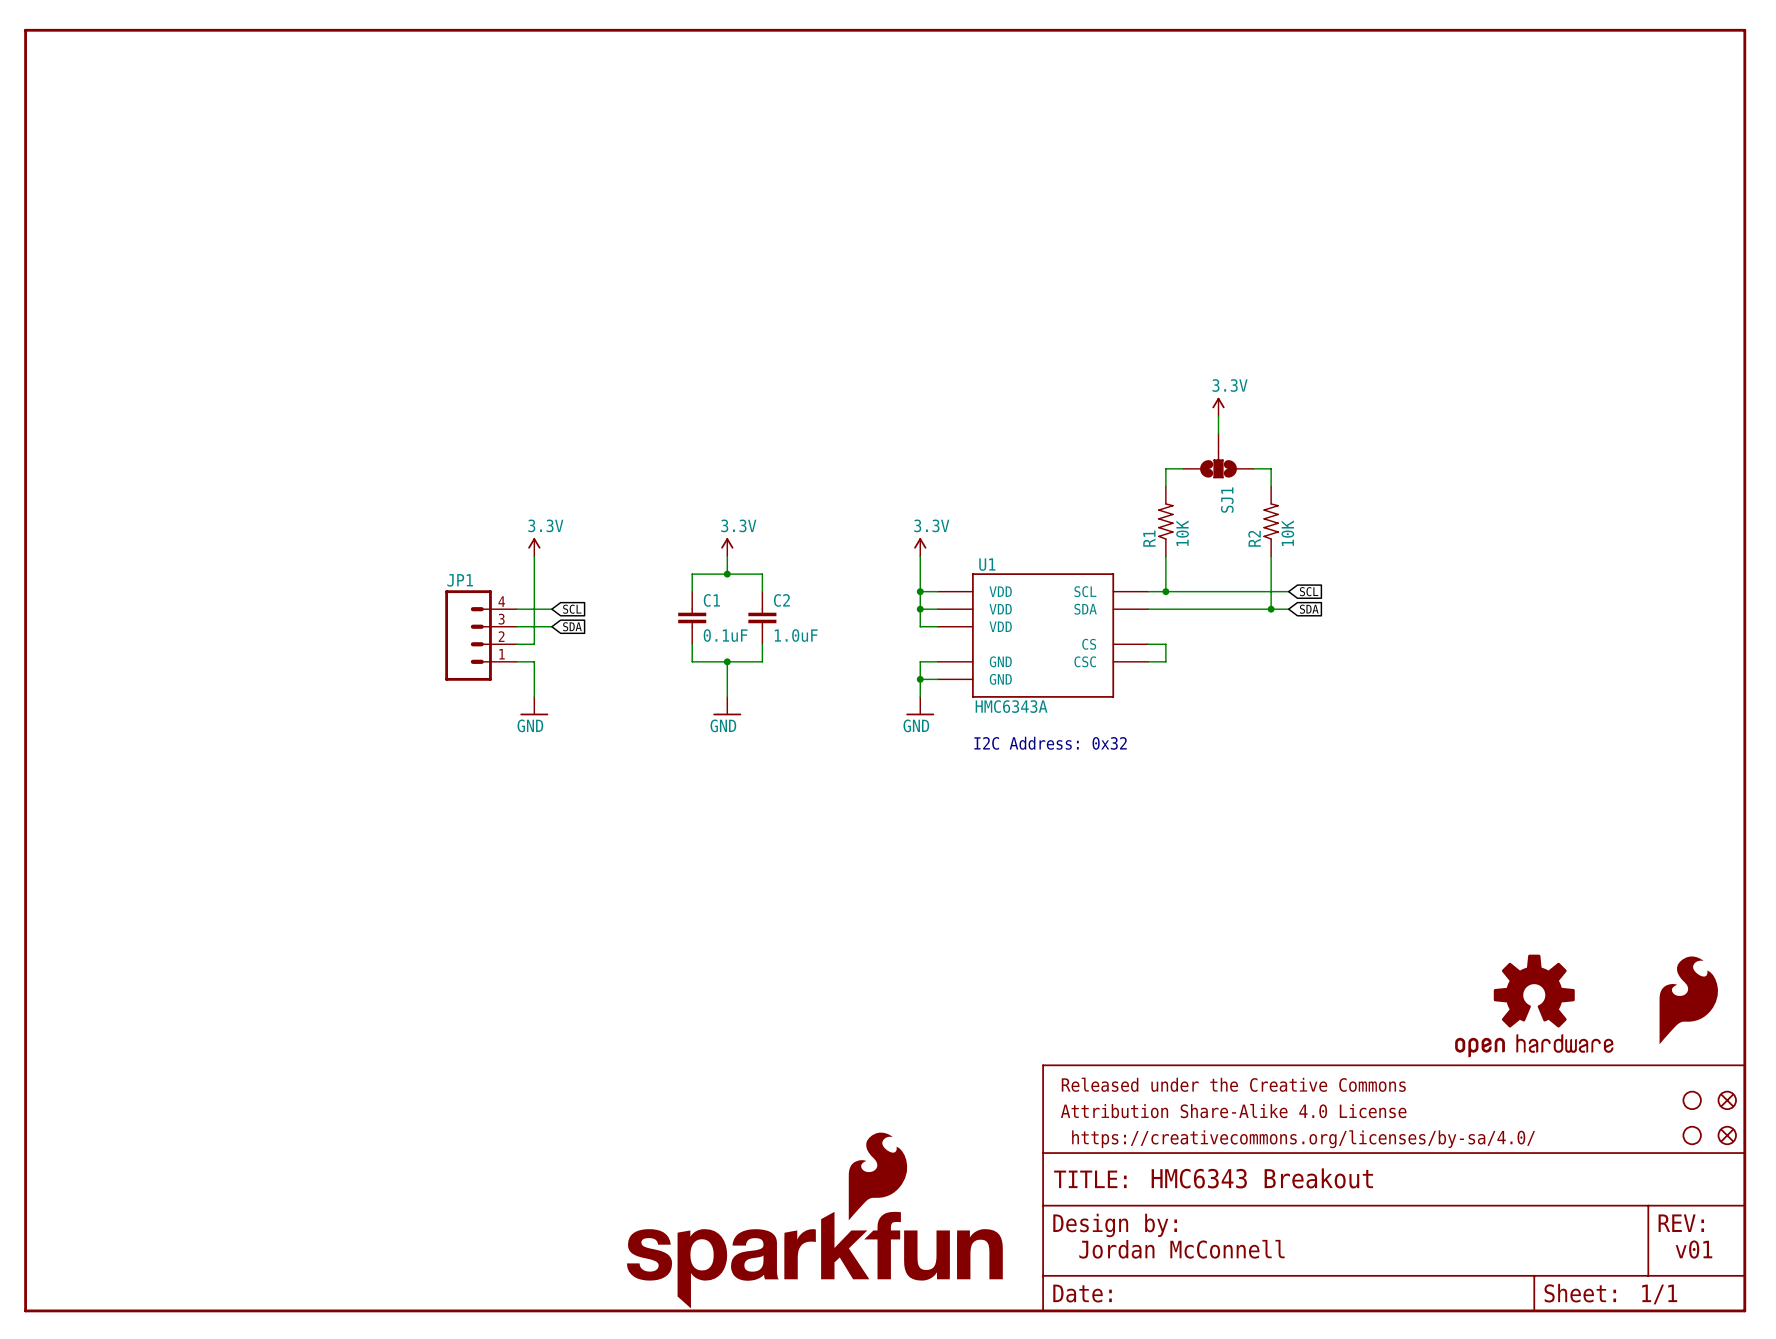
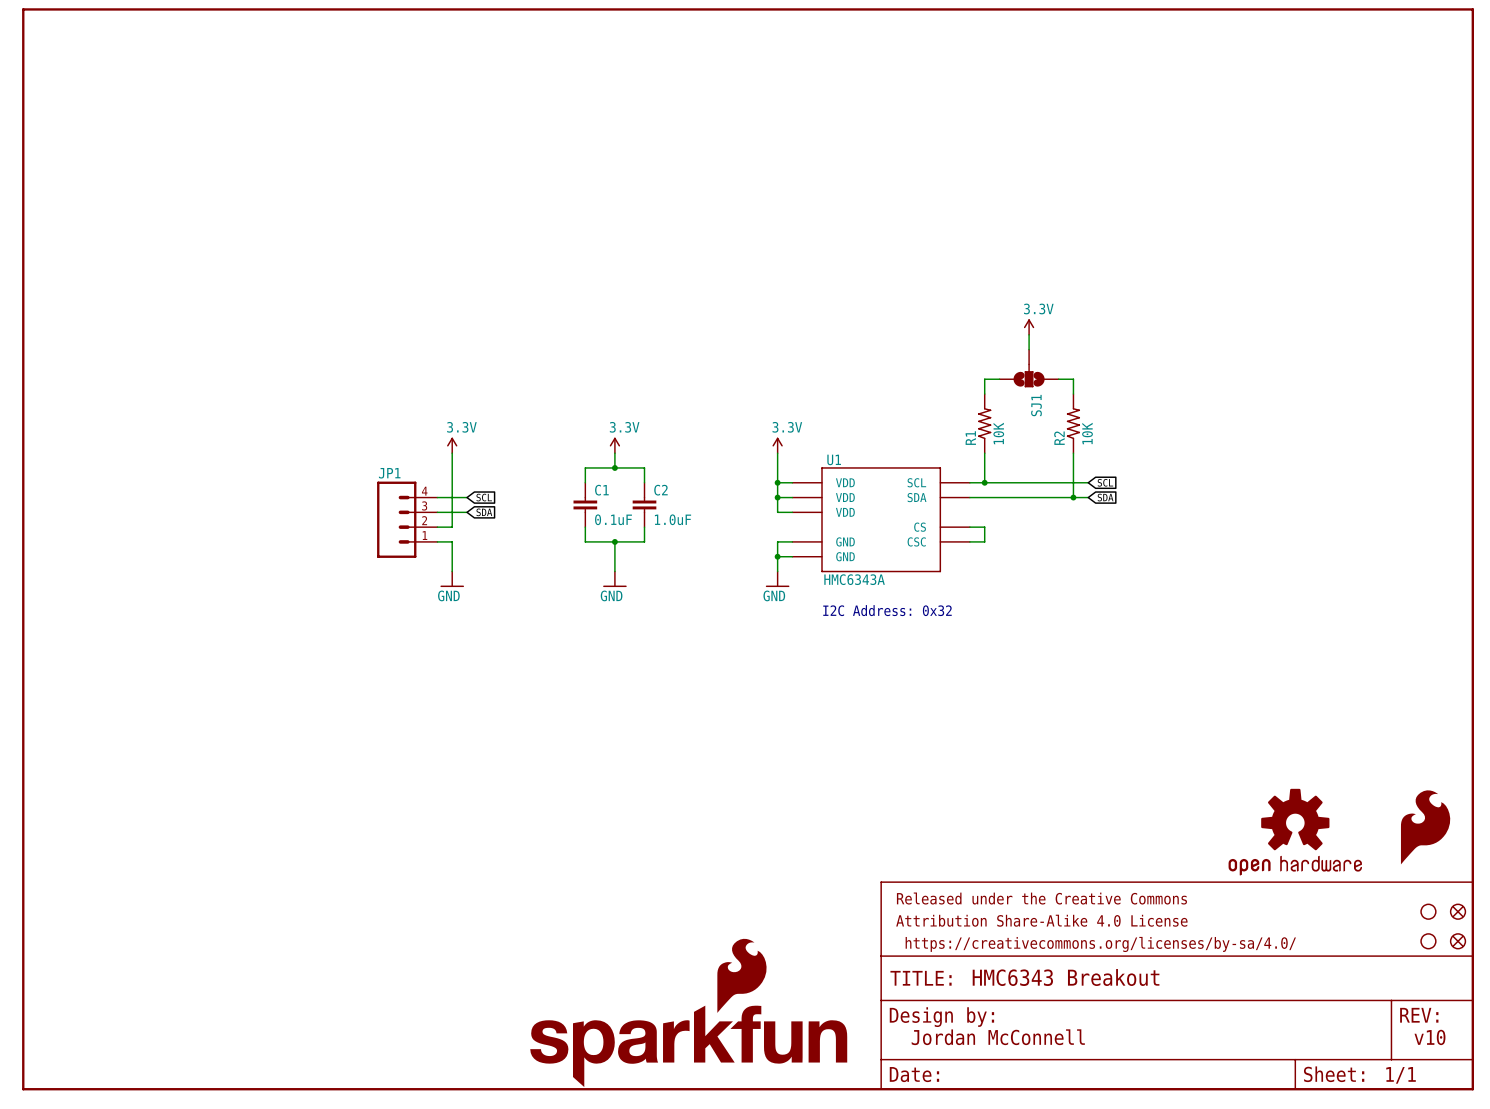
text: v01 (1693, 1249) -> v10 (1429, 1037)

